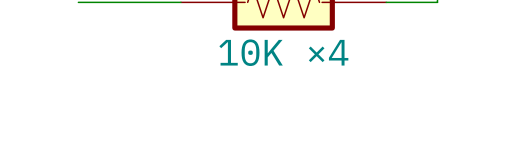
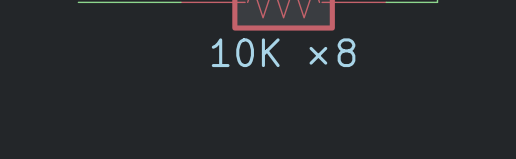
part value: 10K ×4 (283, 52) -> 10K ×8 (283, 52)

